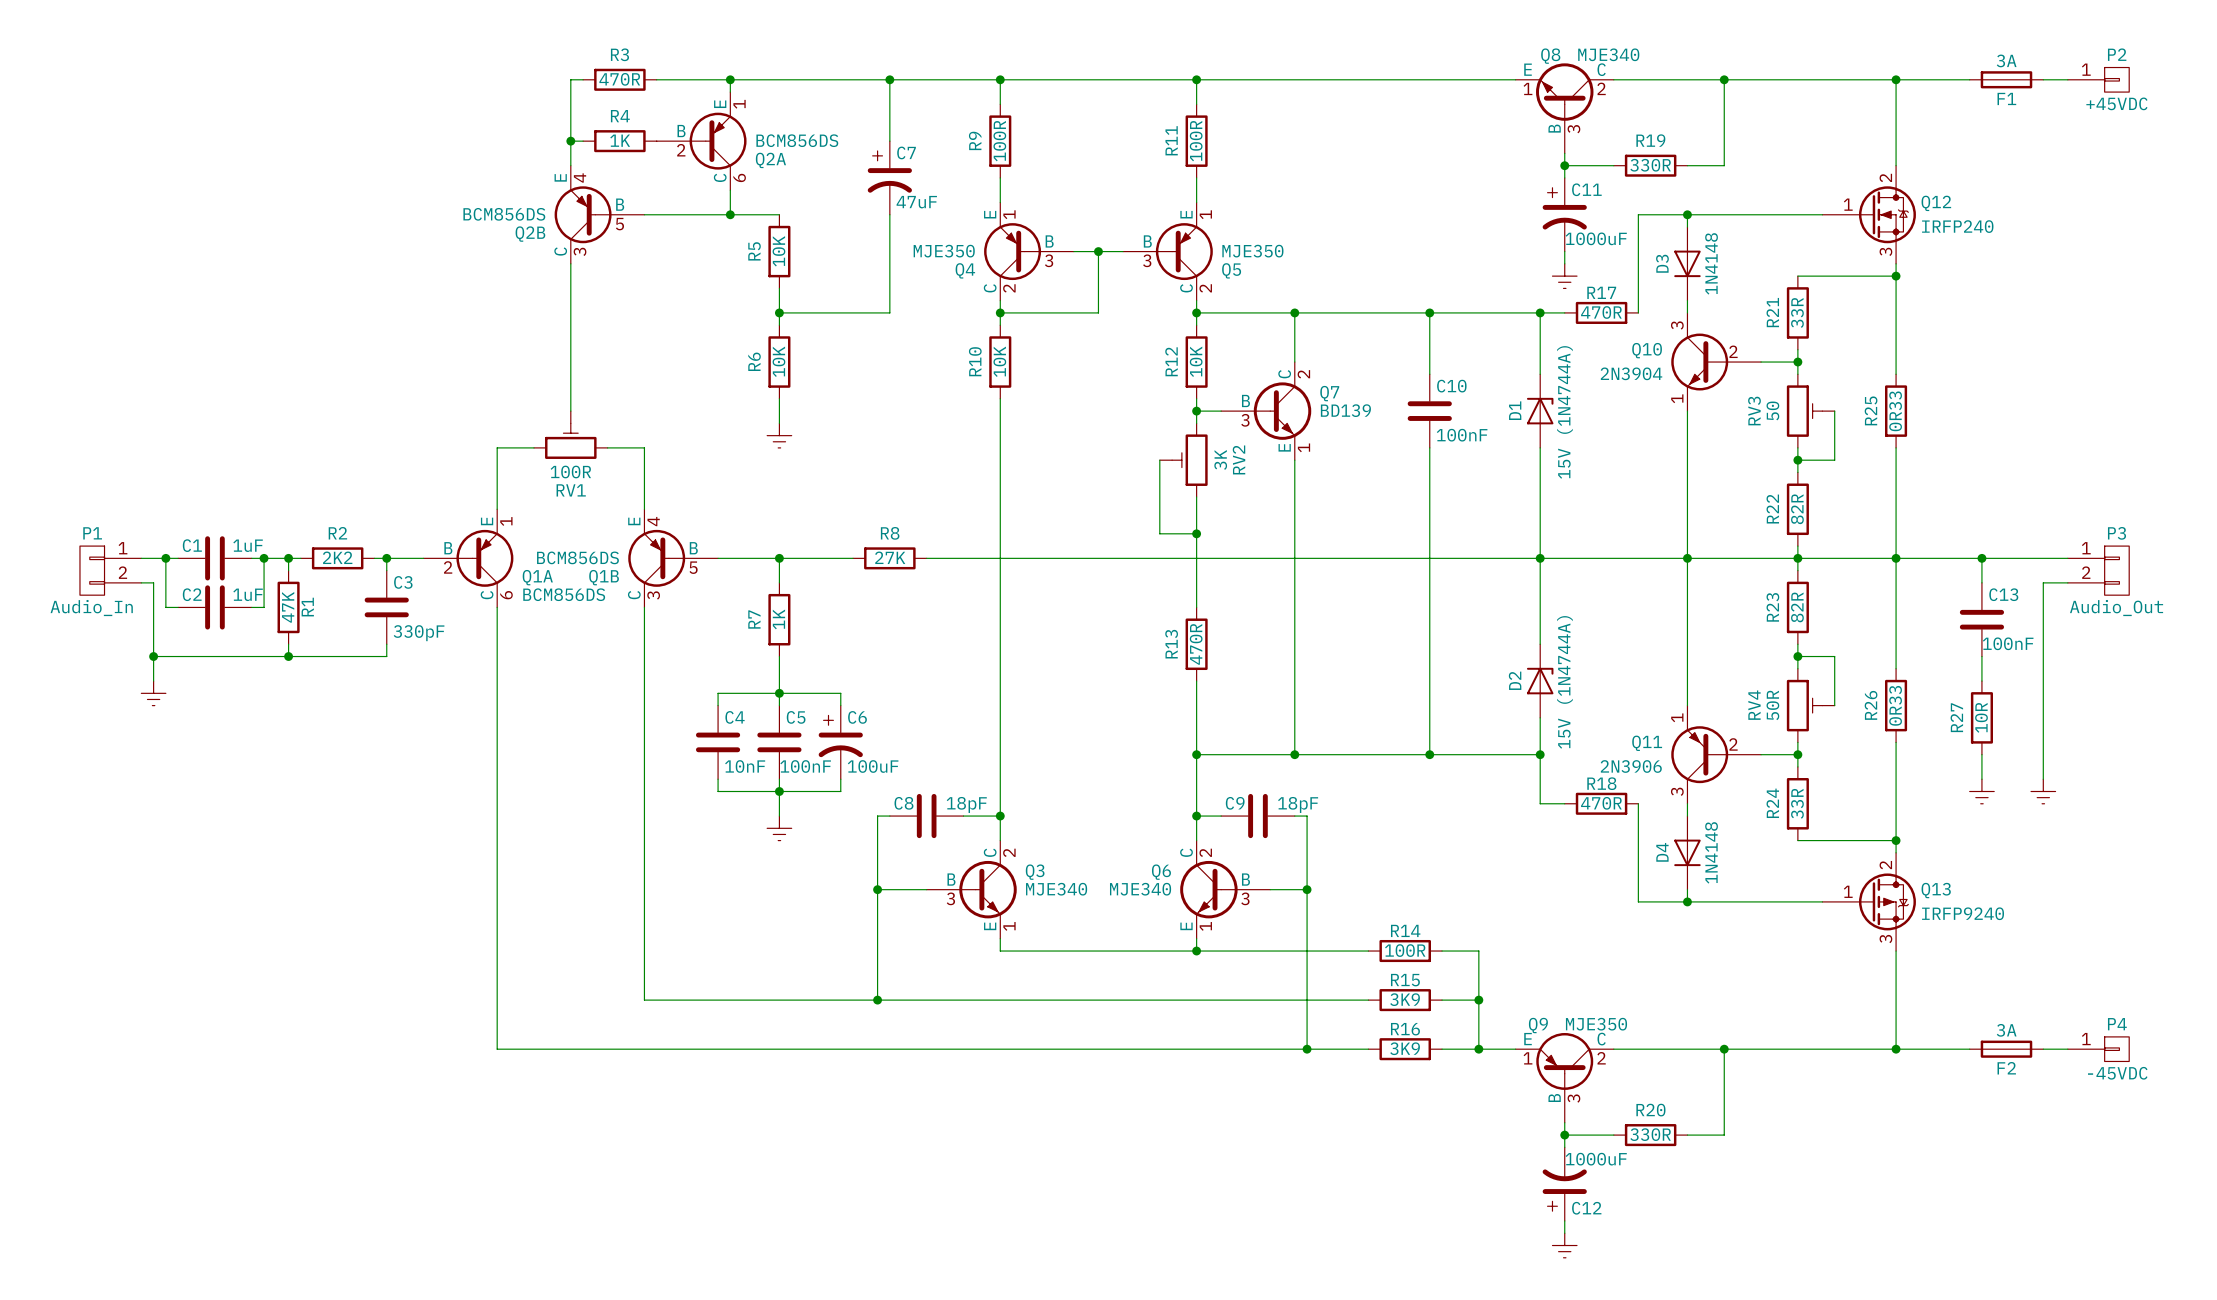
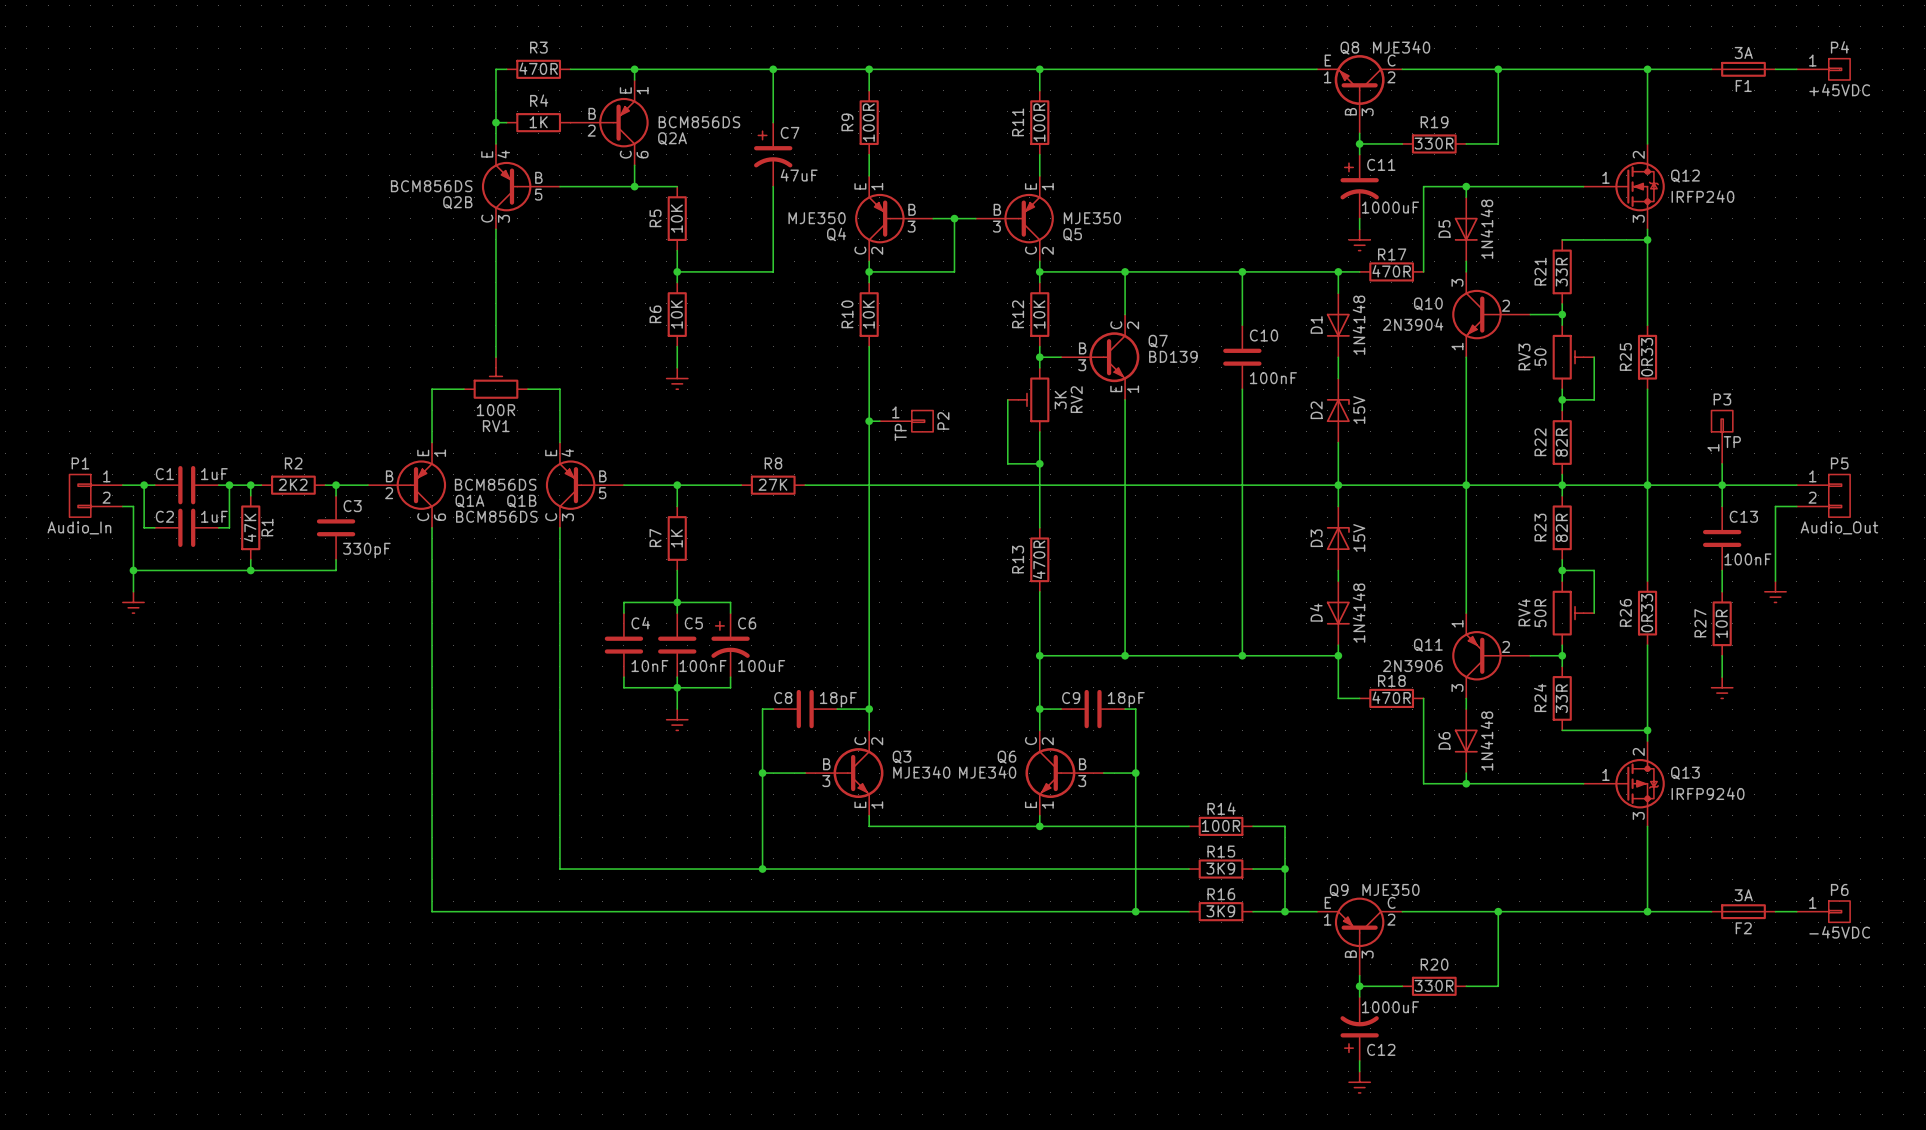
P2 name: P2 (2117, 54) -> P4 (1839, 47)
D3 name: D3 (1662, 263) -> D5 (1444, 229)
D1 symbol: [1526, 374, 1554, 448] -> [1326, 293, 1350, 358]
D1 value: 15V (1N4744A) (1564, 412) -> 1N4148 (1358, 325)
wire: none -> (869, 421) (879, 421)
junction: none -> (869, 421)
P2: none -> TP (906, 421)
P3: none -> TP (1722, 437)
wire: none -> (1722, 463) (1722, 485)
P3 name: P3 (2116, 533) -> P5 (1839, 463)
D3: none -> 15V (1338, 538)
wire: (2043, 668) (2043, 779) -> none
D2 position: (1540, 681) -> (1338, 410)
D2 value: 15V (1N4744A) (1564, 682) -> 15V (1359, 410)
D4: none -> 1N4148 (1338, 613)
power symbol position: (2043, 791) -> (1775, 591)
D4 name: D4 (1662, 852) -> D6 (1444, 740)
P4 name: P4 (2117, 1024) -> P6 (1839, 889)

